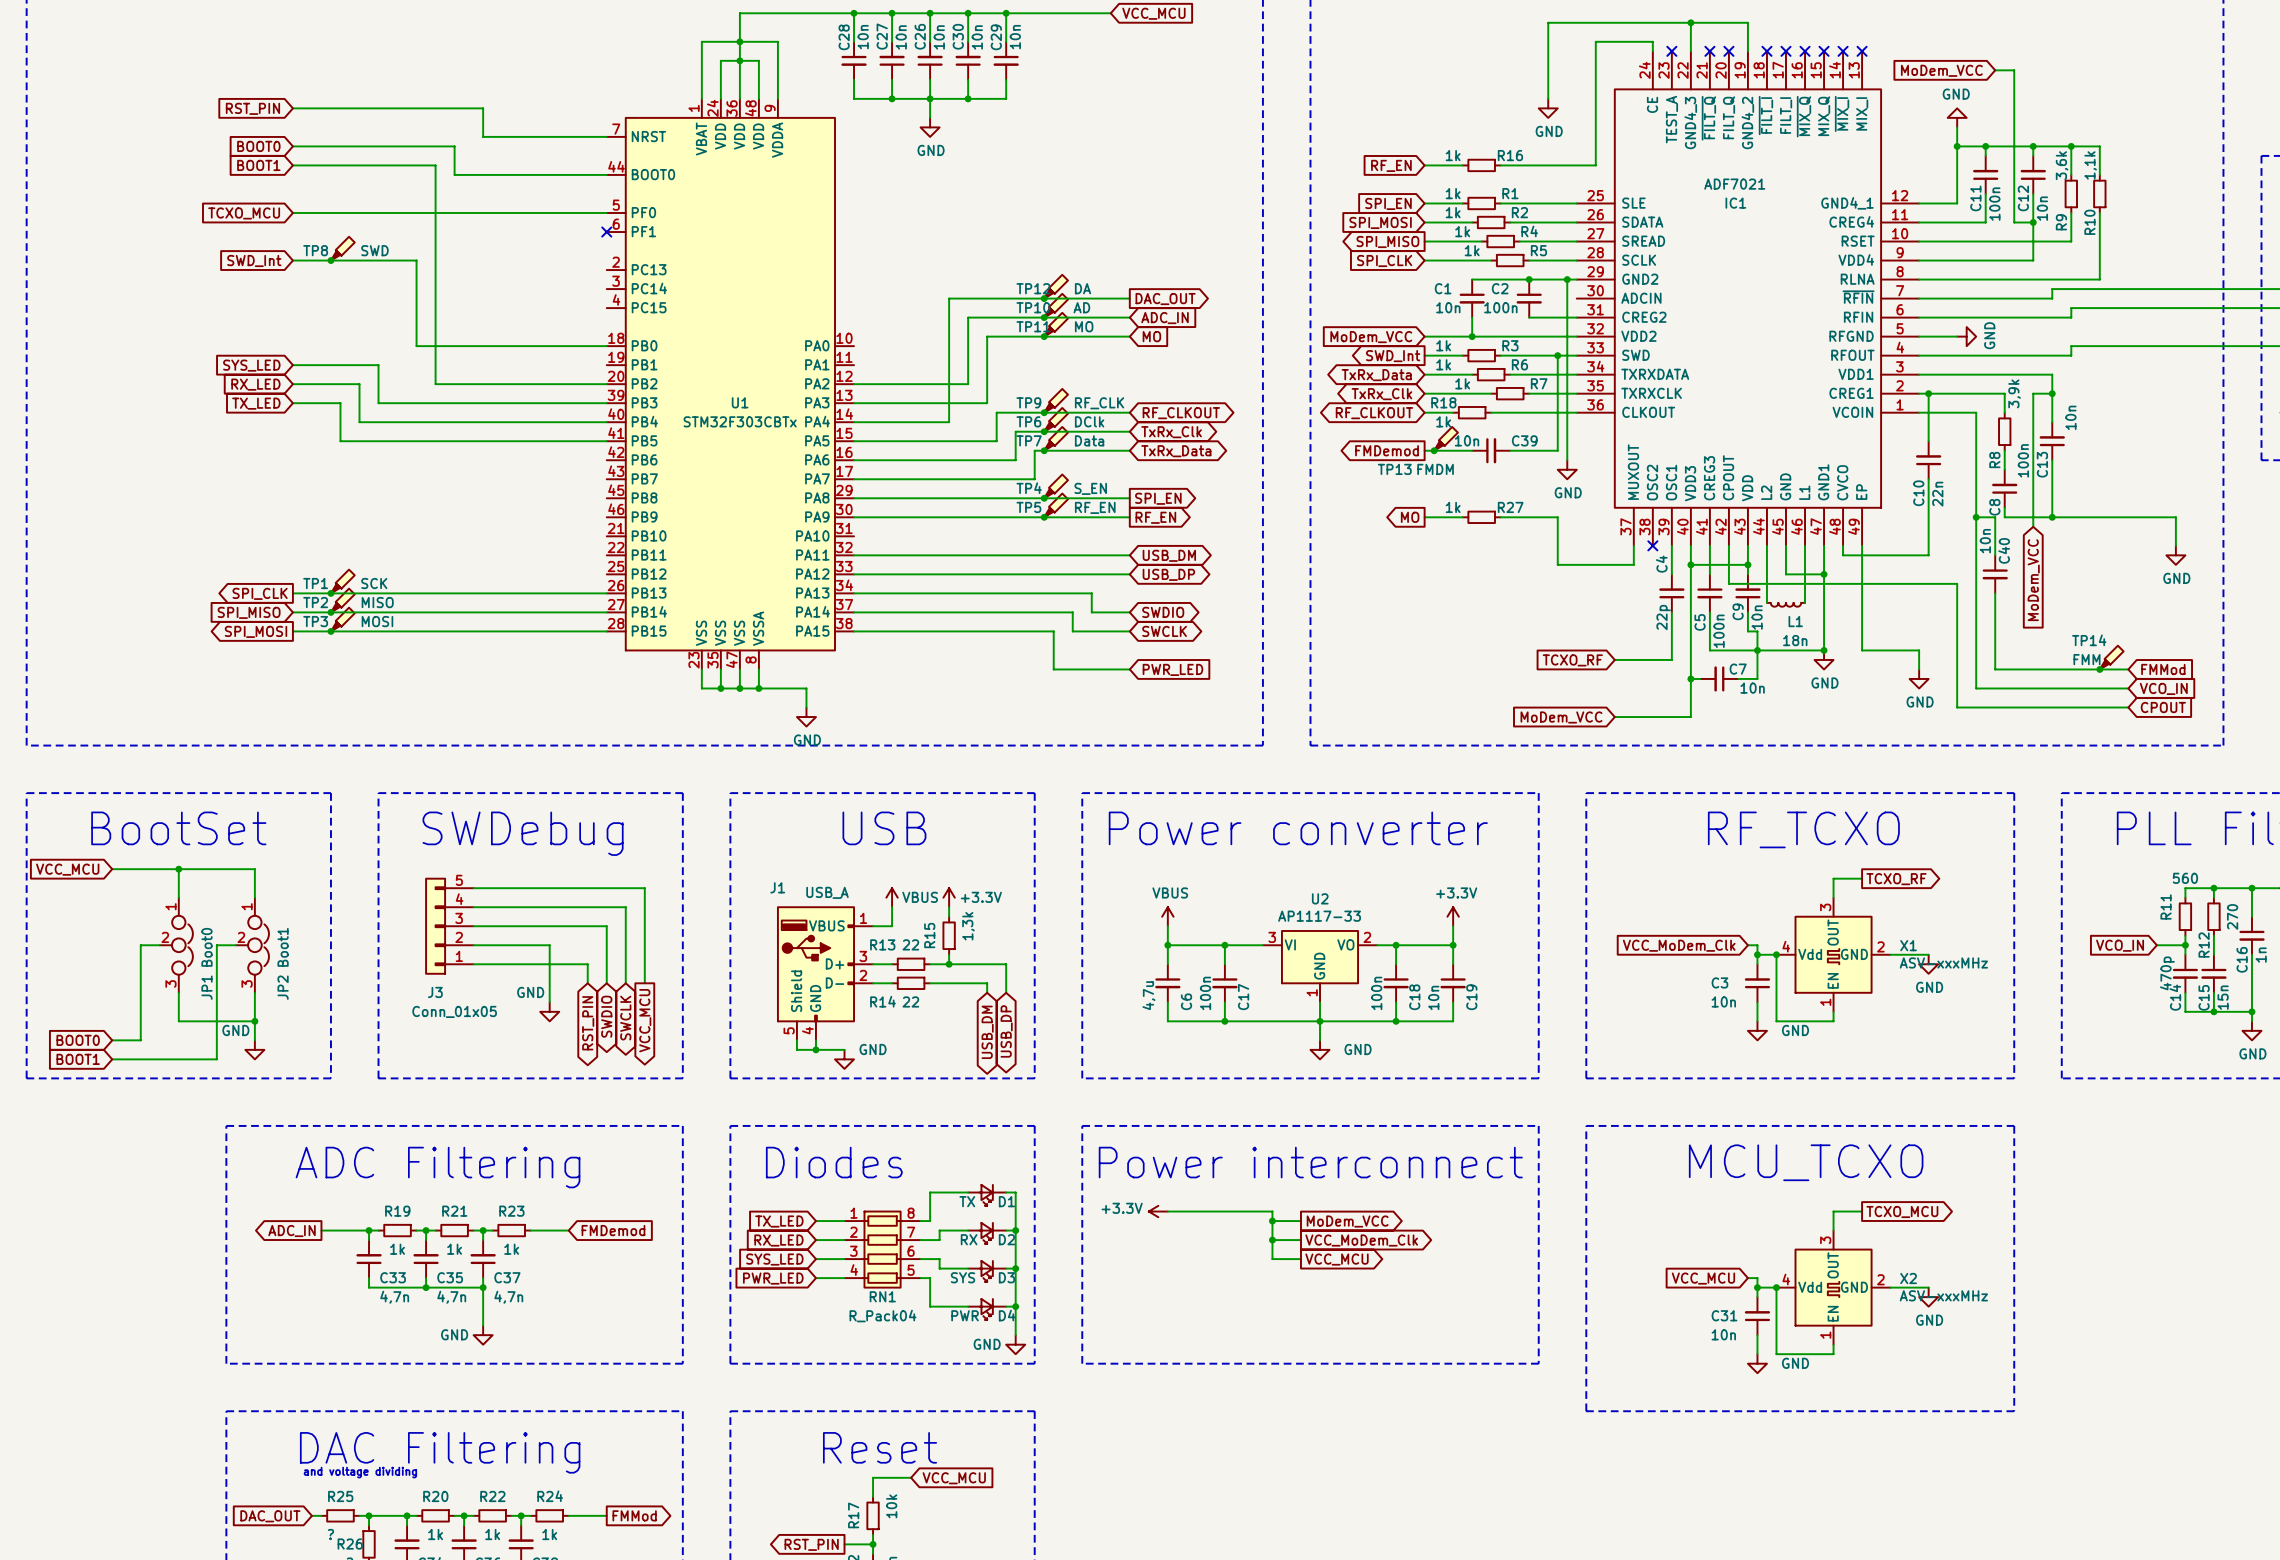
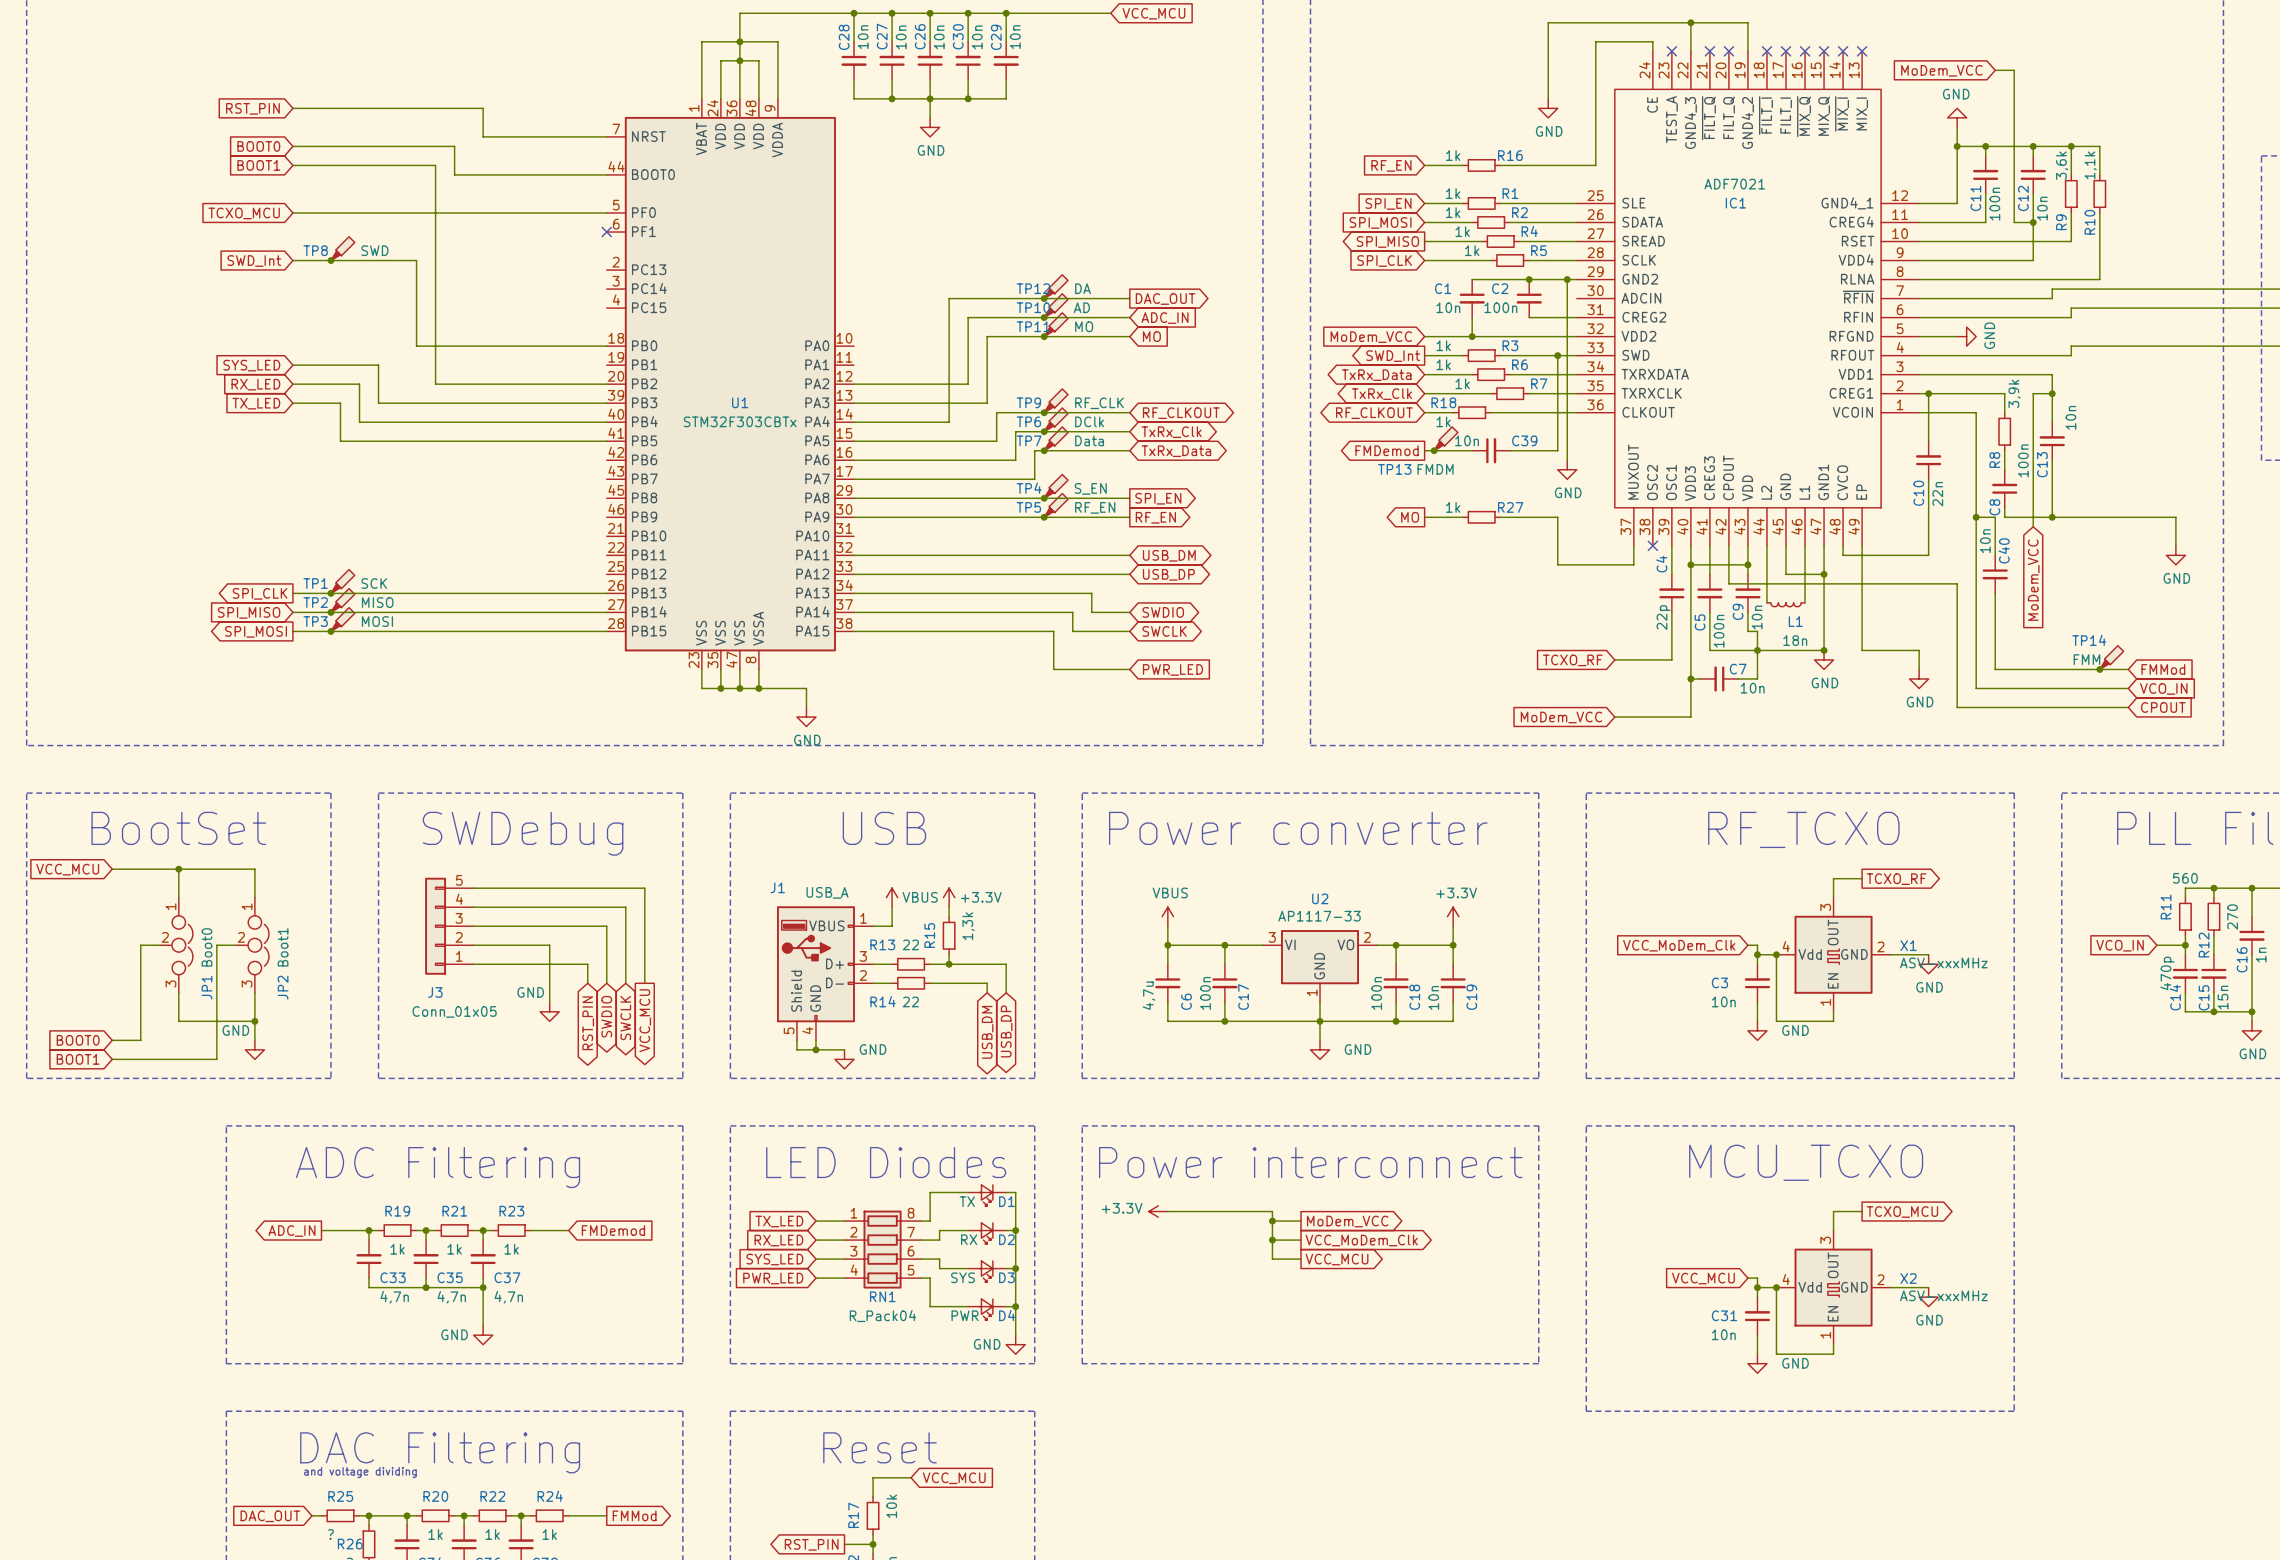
text: Diodes (834, 1162) -> LED Diodes (886, 1162)

